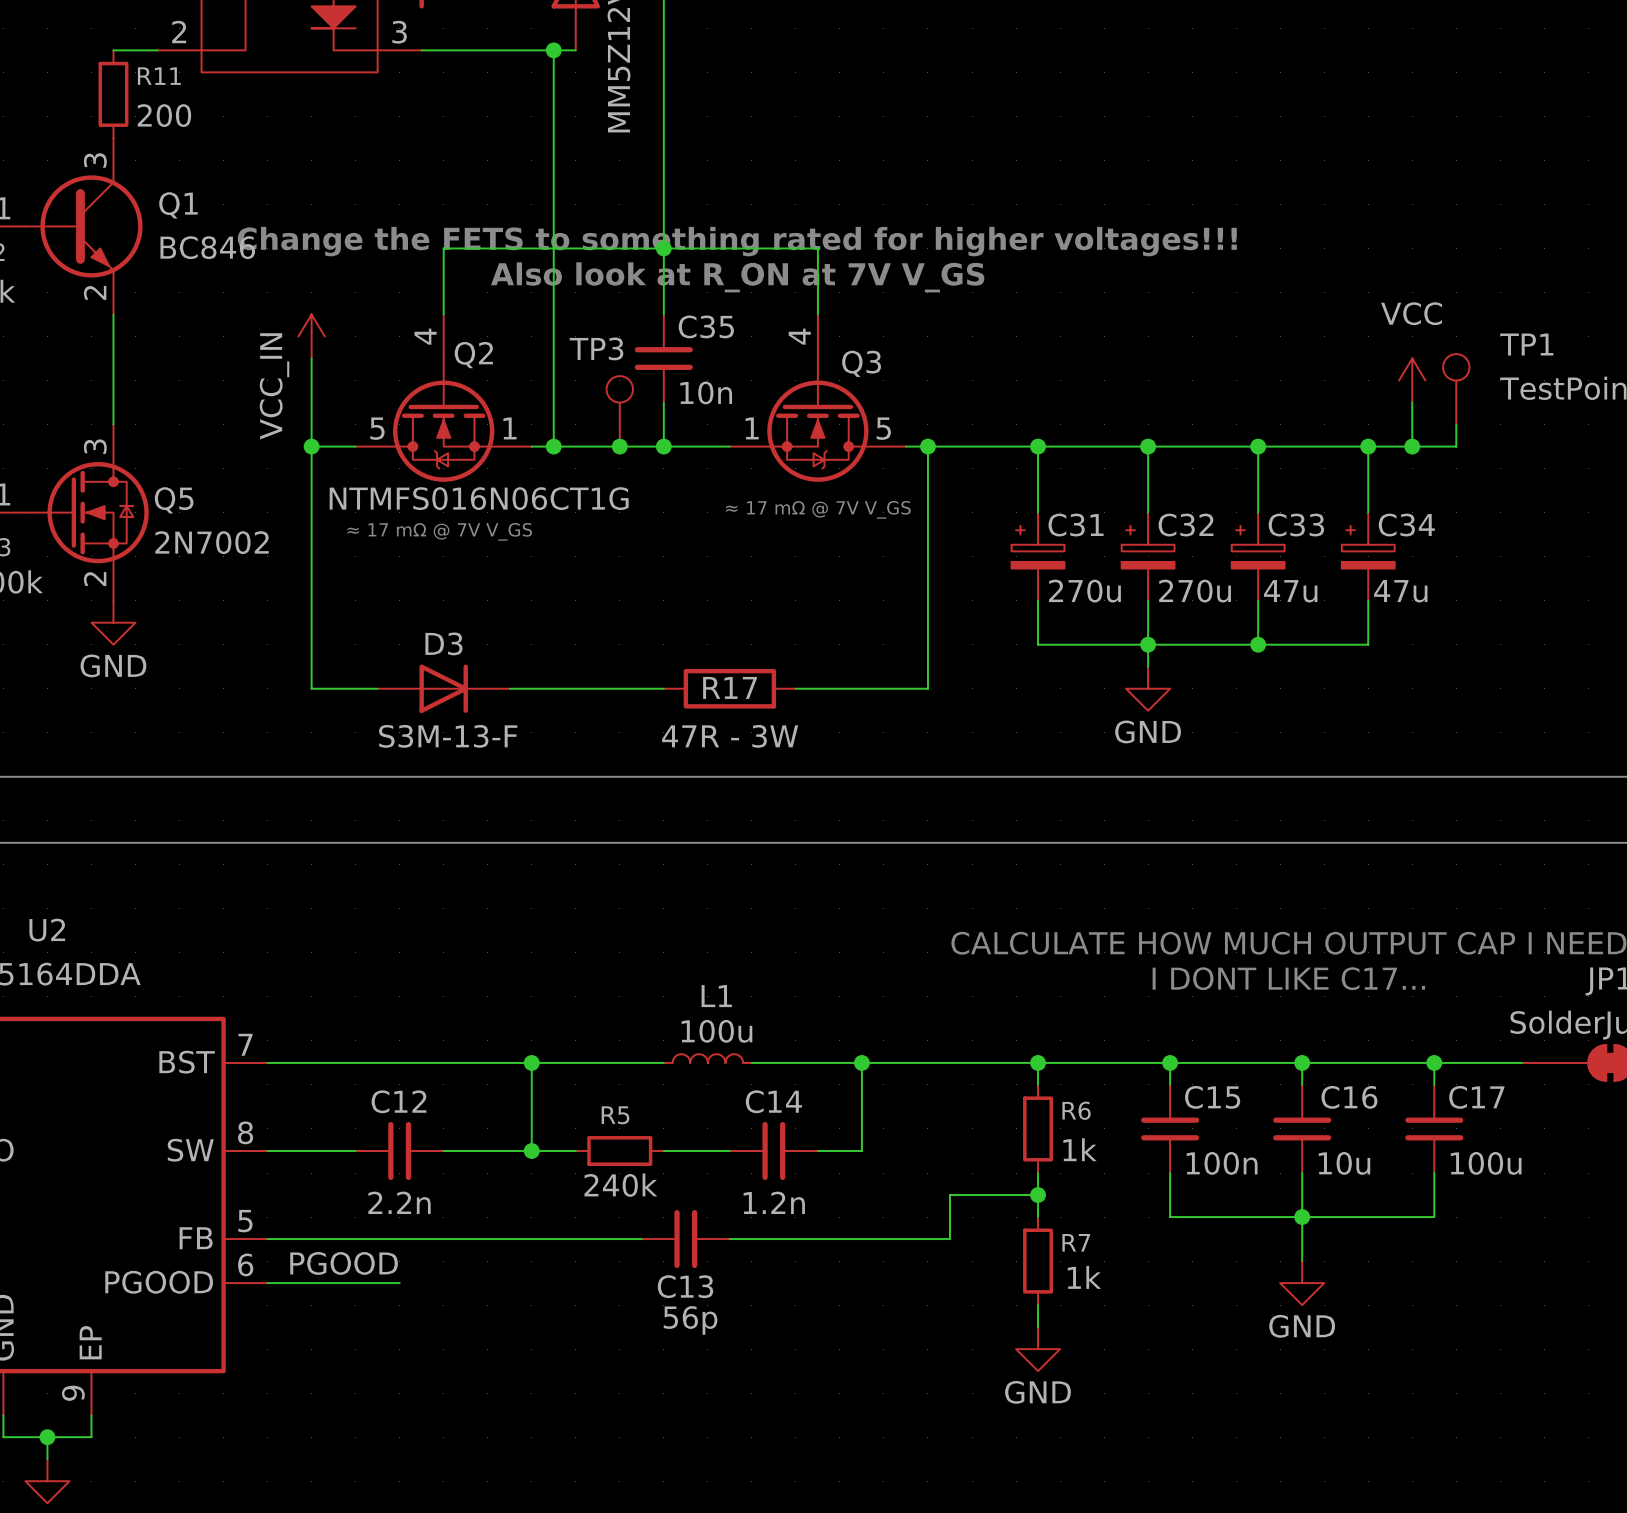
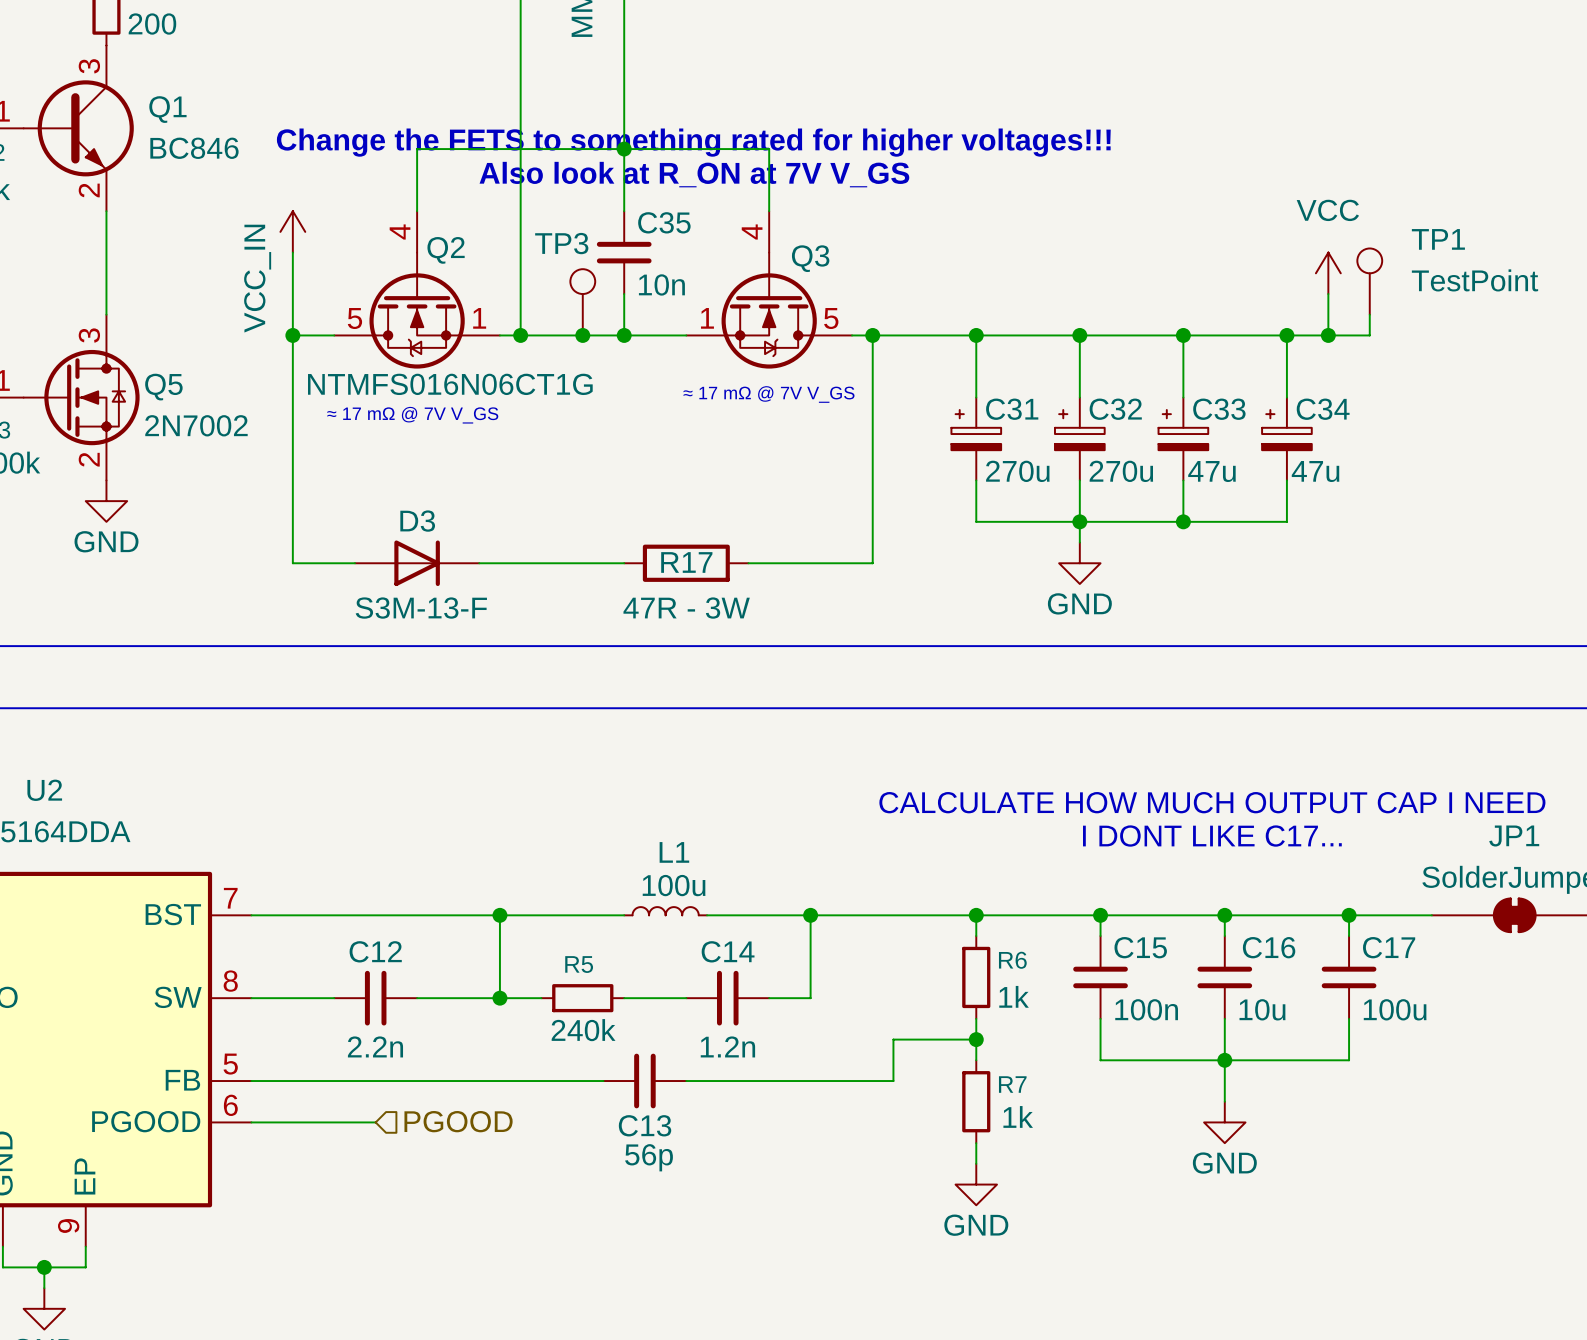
label: PGOOD (344, 1263) -> none
hierarchical label: none -> PGOOD (458, 1121)

